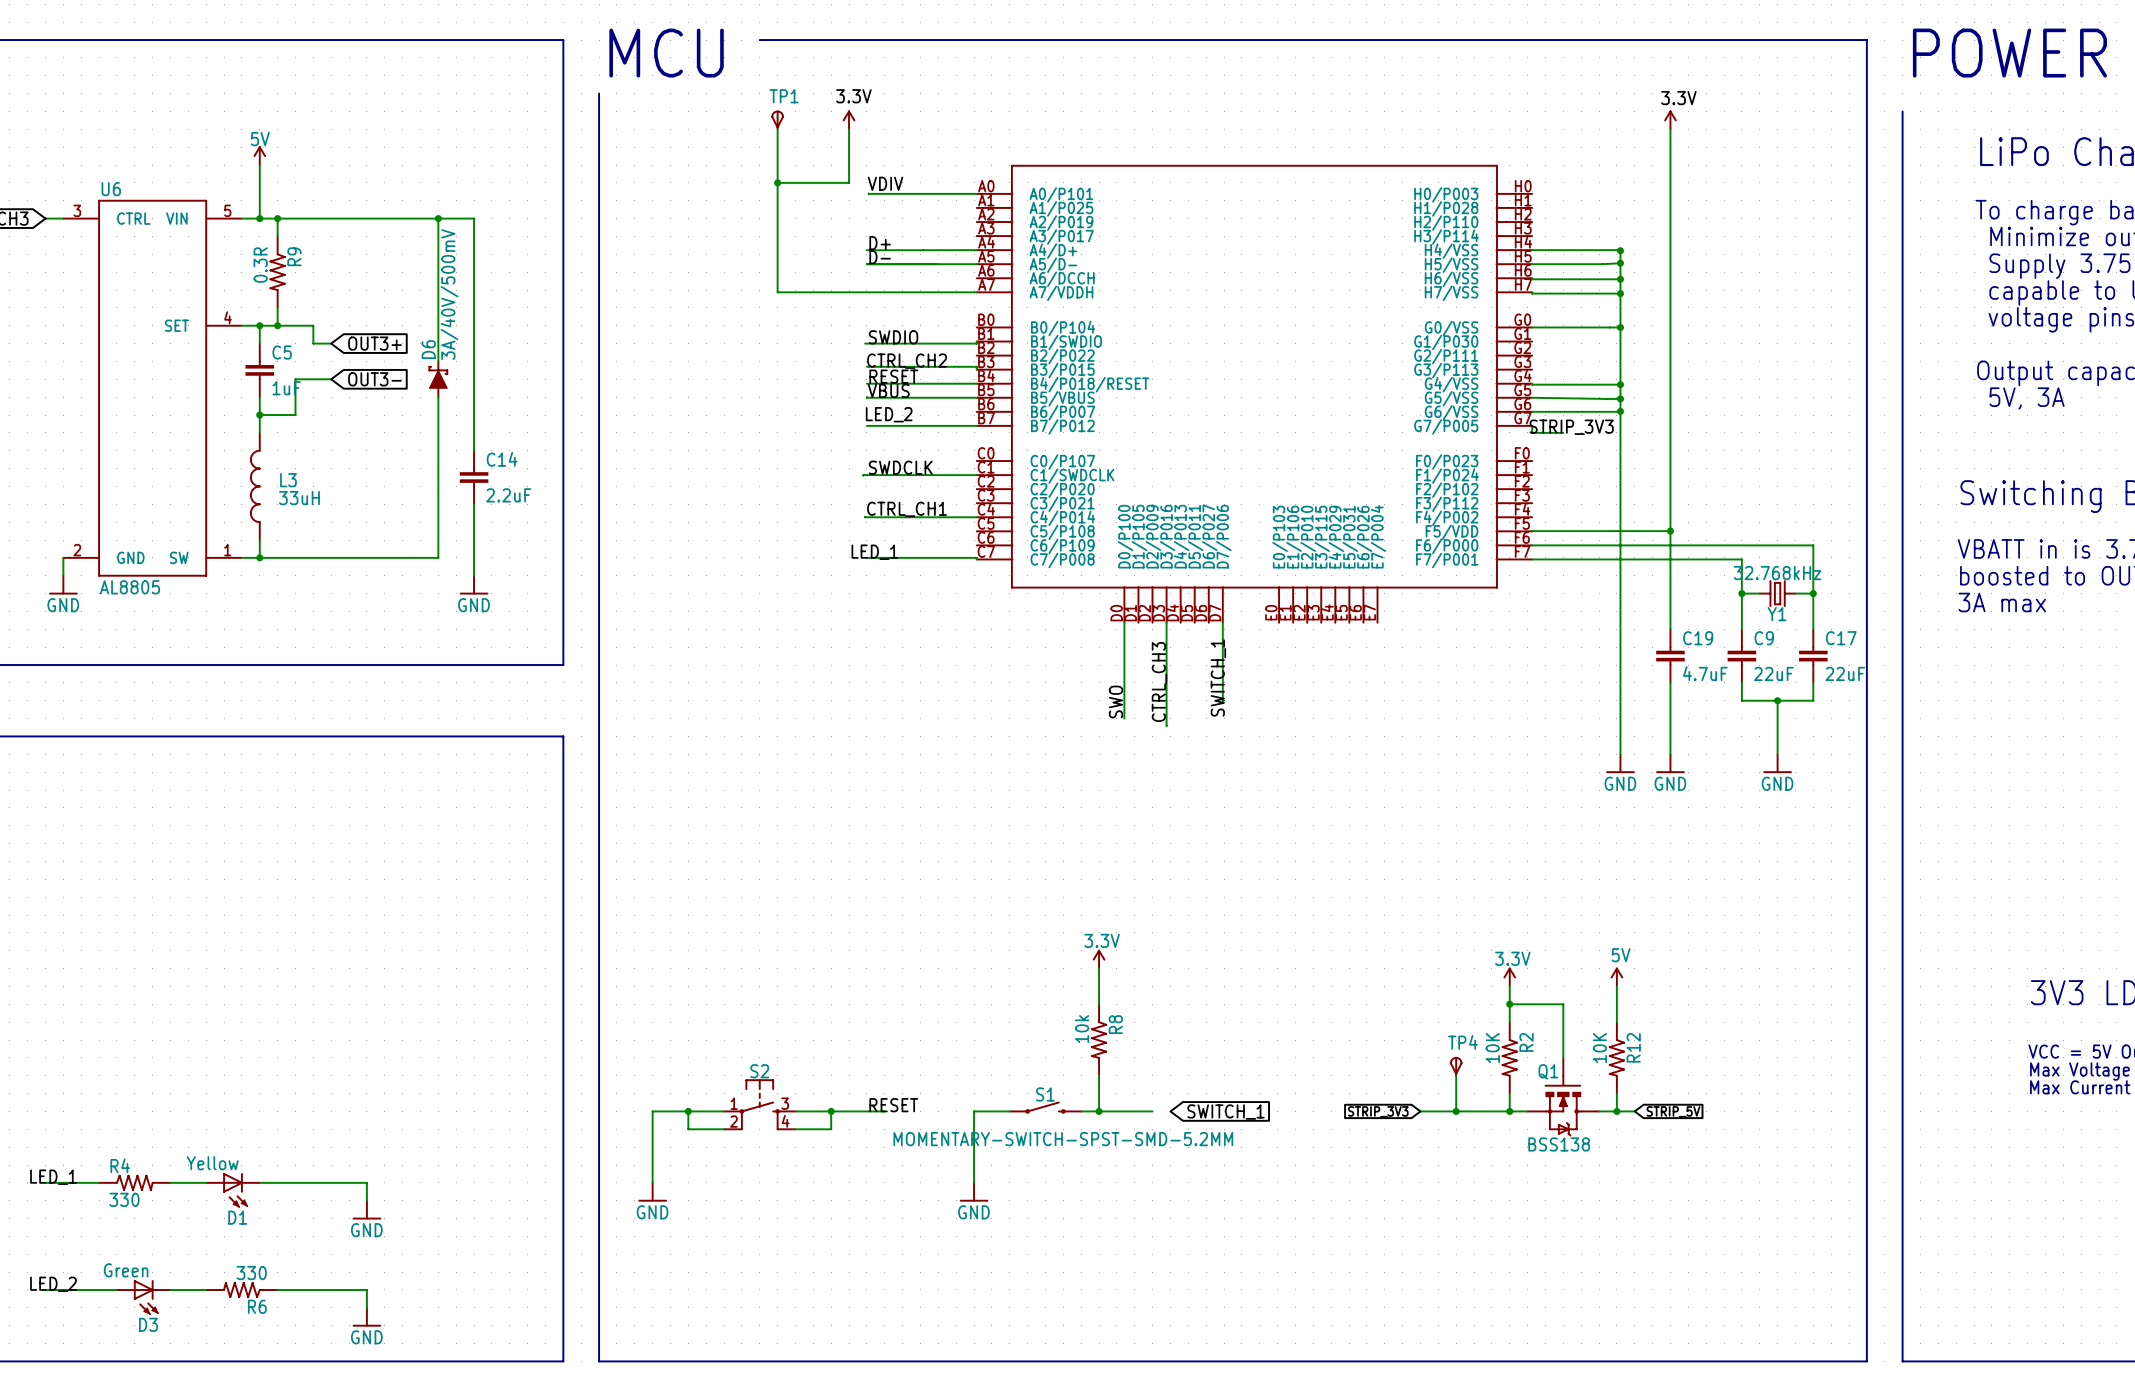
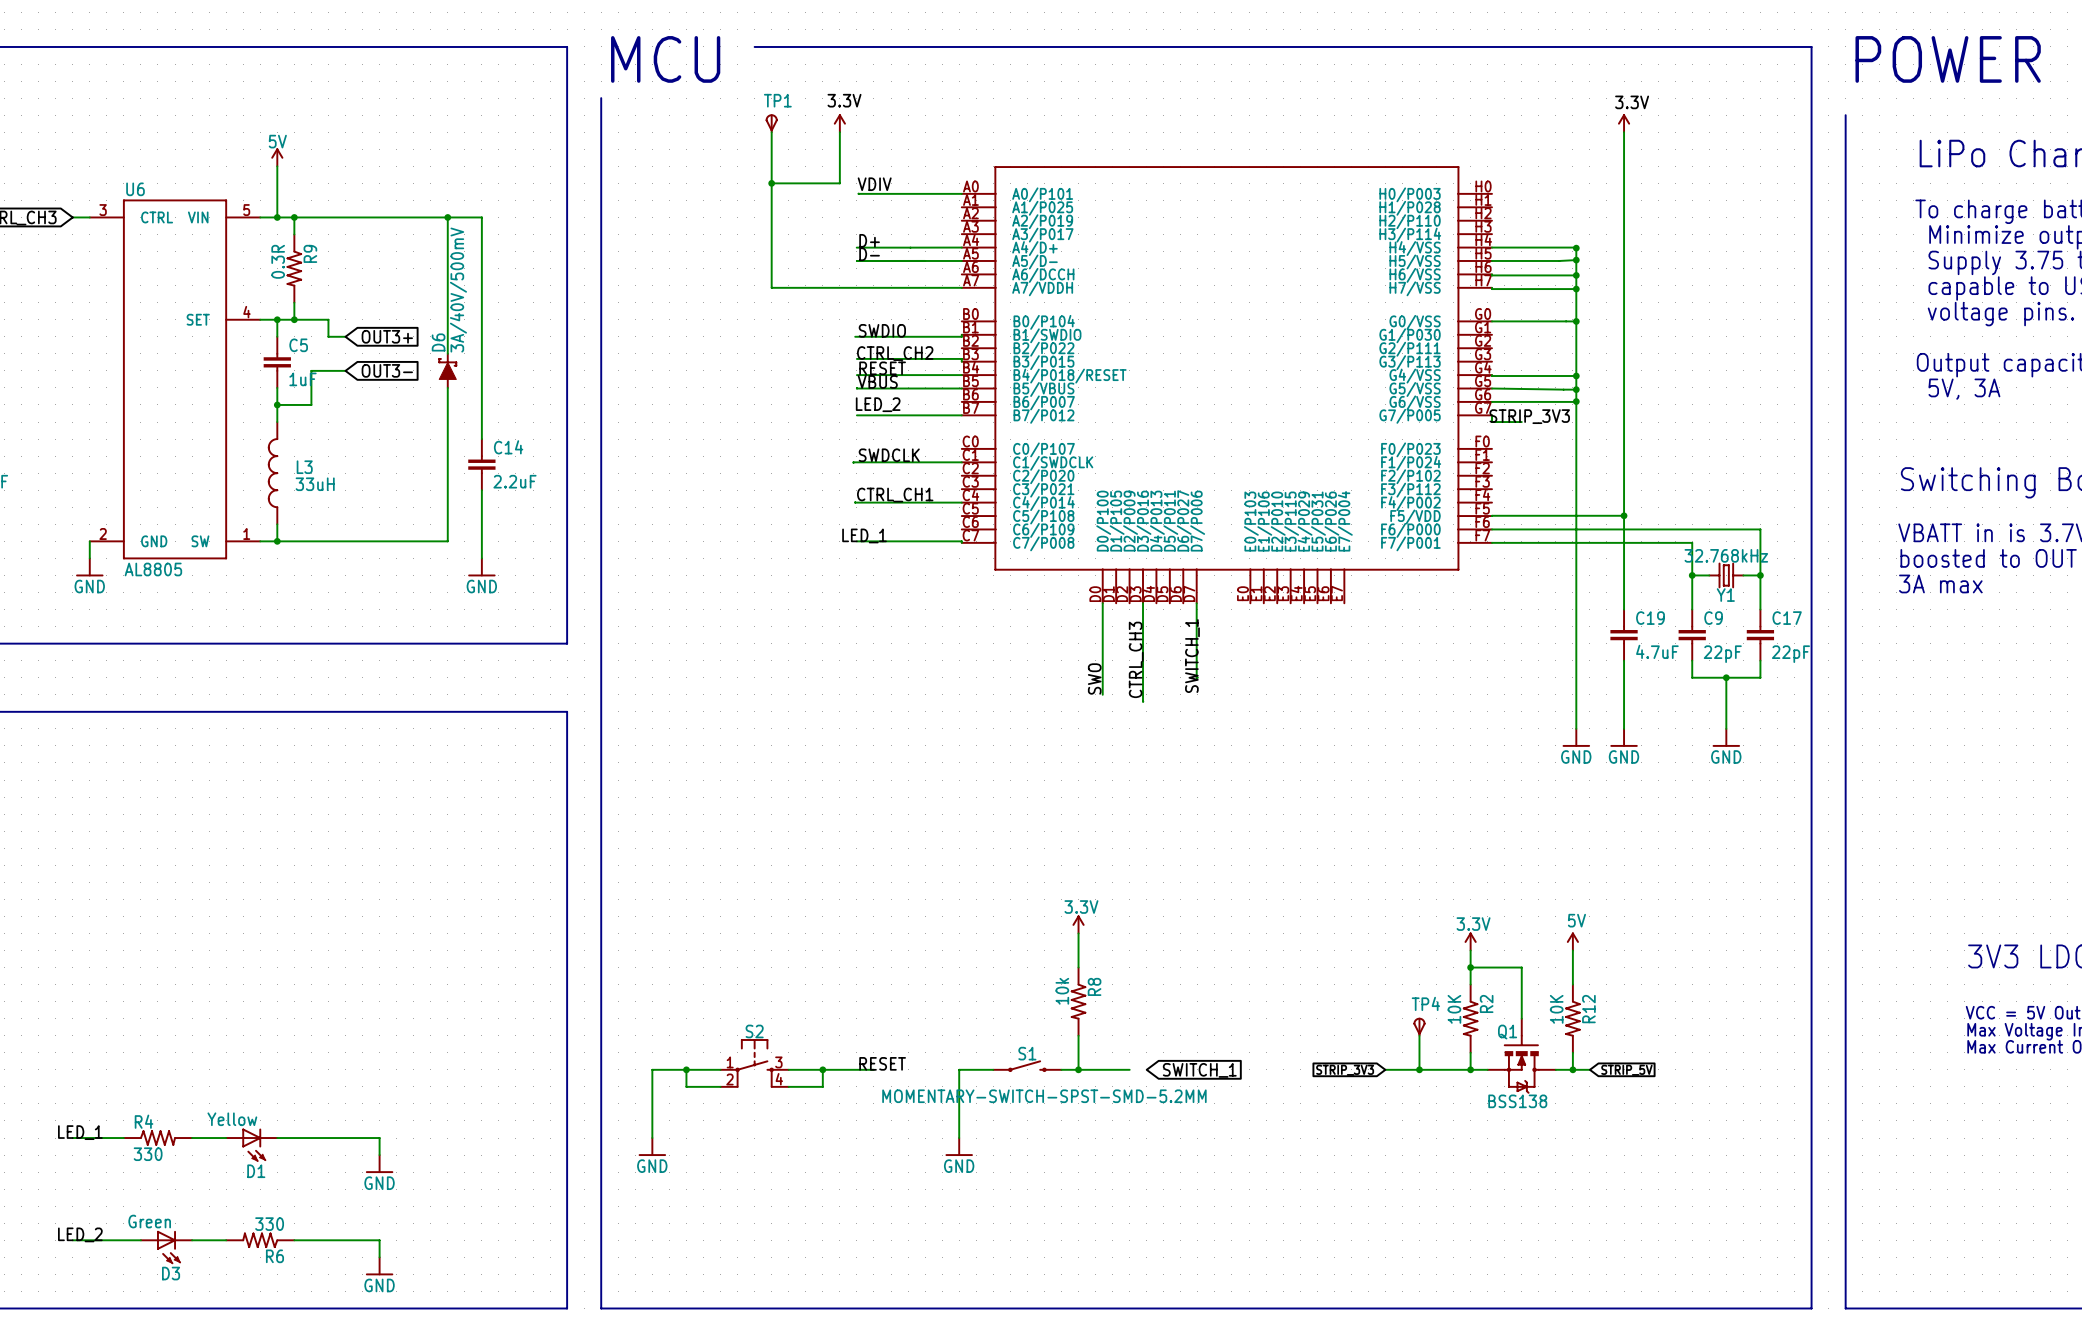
C9 value: 22uF (1773, 673) -> 22pF (1722, 654)
C17 value: 22uF (1845, 673) -> 22pF (1790, 654)

